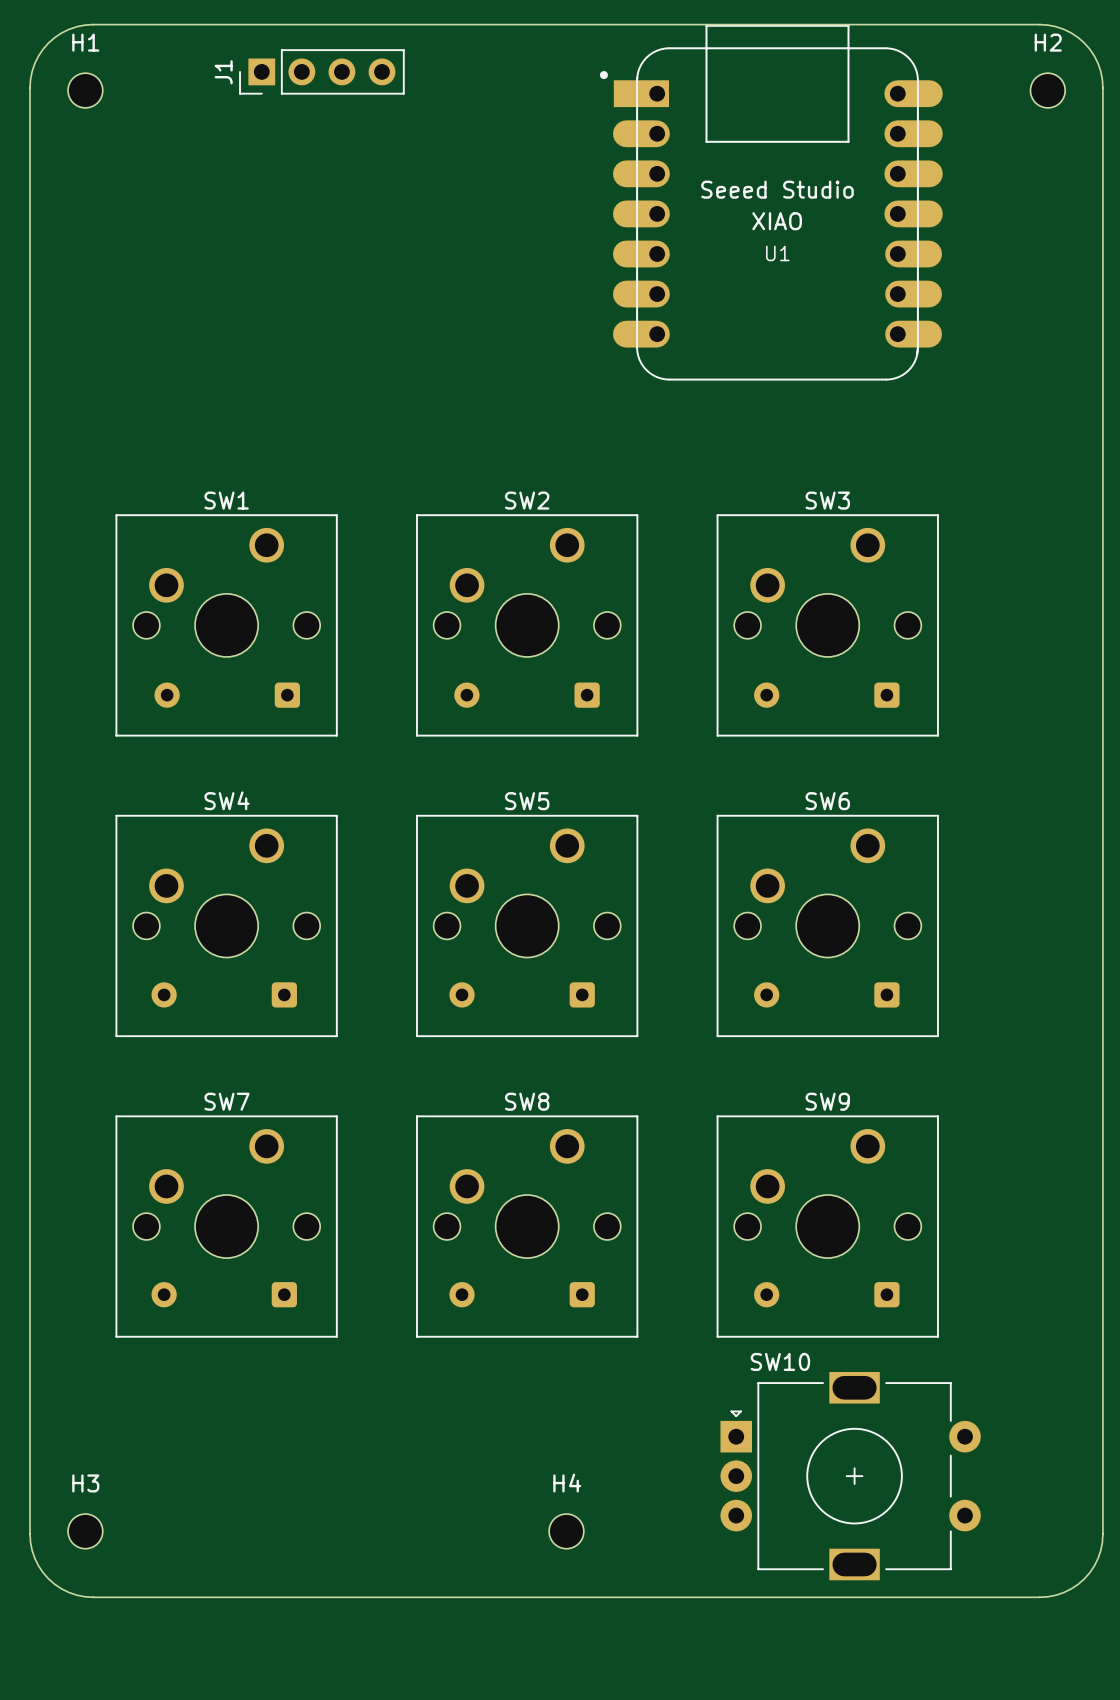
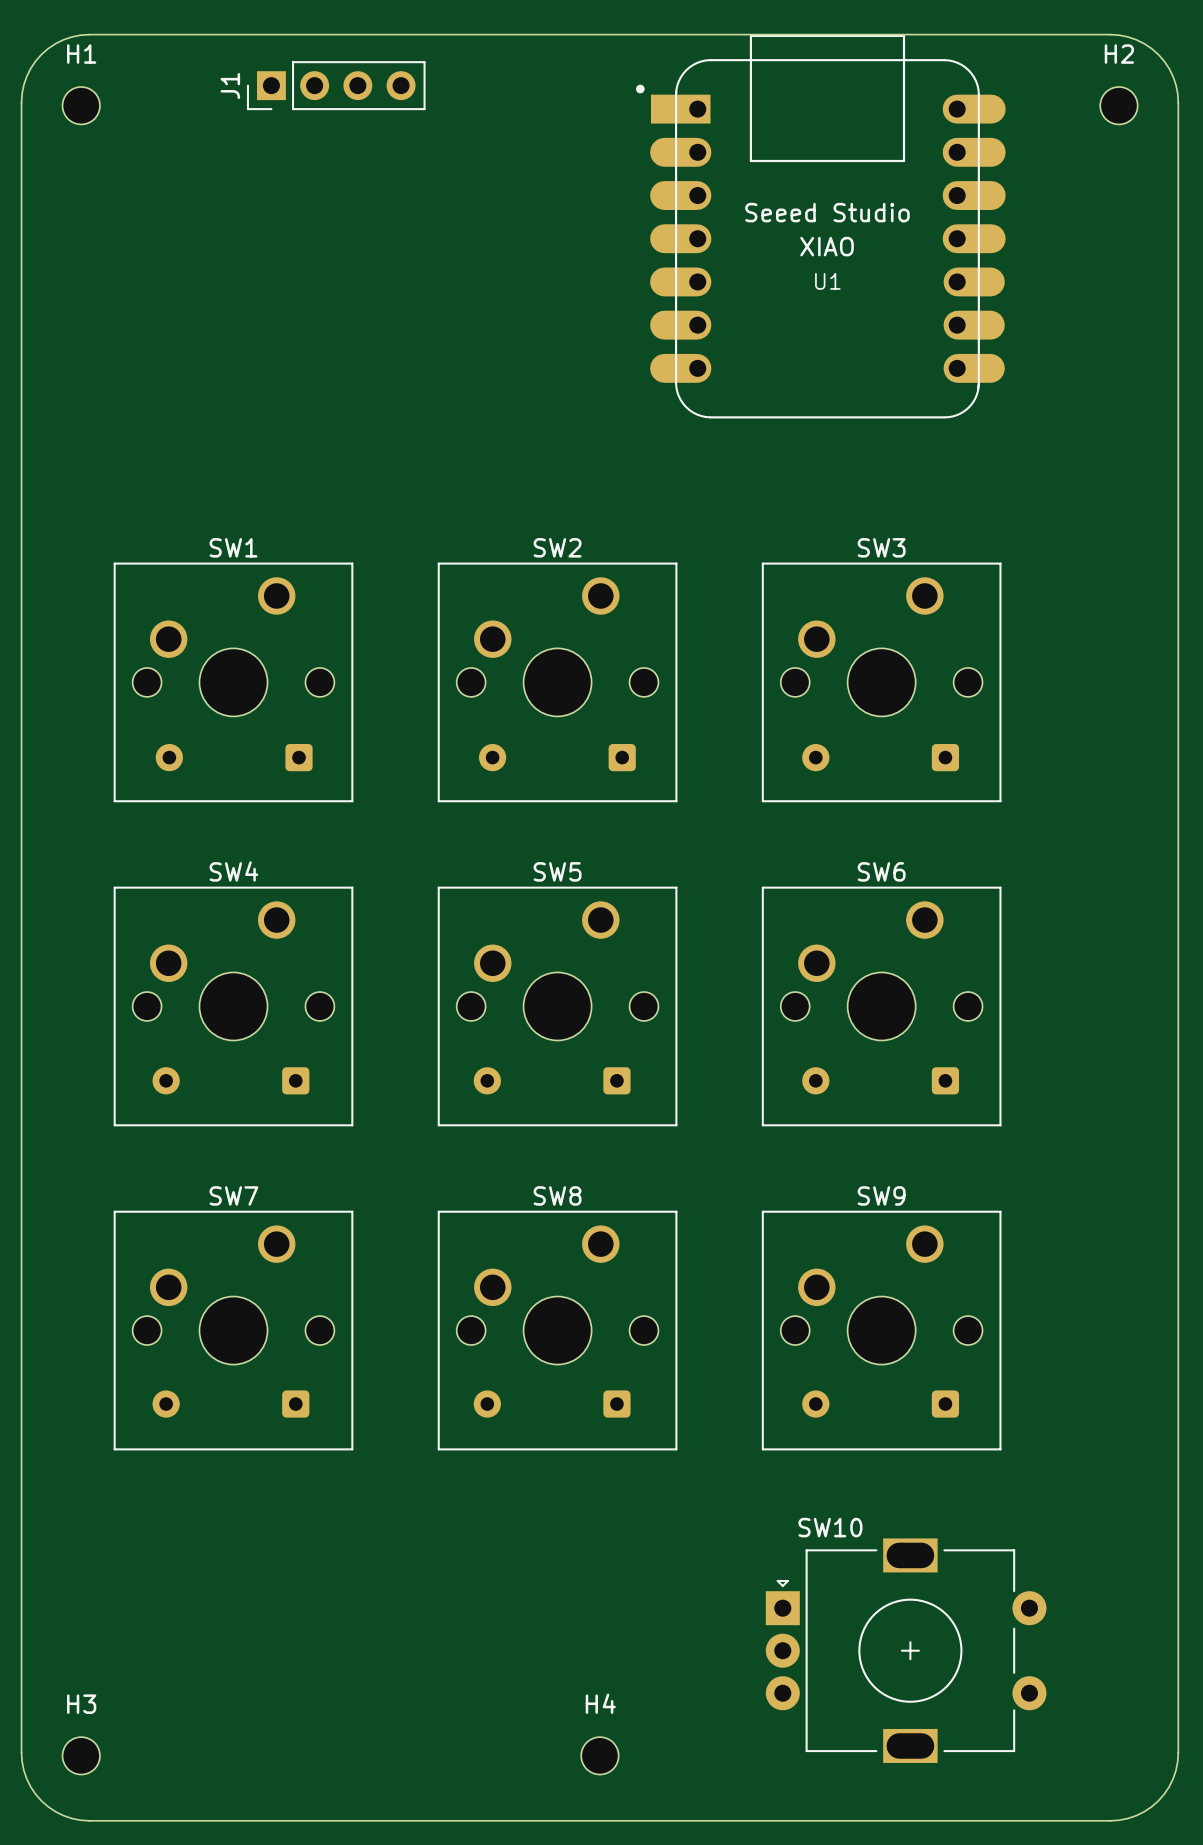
SW10 position: (850, 1476) -> (906, 1650)
H3 position: (85, 1531) -> (81, 1755)
H4 position: (566, 1531) -> (599, 1755)
board edge: (30, 1534) (34, 1558) (48, 1578) (68, 1592) (93, 1597) (1039, 1597) (1063, 1592) (1084, 1578) (1098, 1558) (1102, 1534) -> (21, 1662) (21, 1752) (26, 1778) (35, 1794) (48, 1806) (71, 1818) (89, 1820) (1119, 1820) (1136, 1815) (1151, 1806) (1164, 1794) (1173, 1778) (1178, 1752) (1178, 1662)

